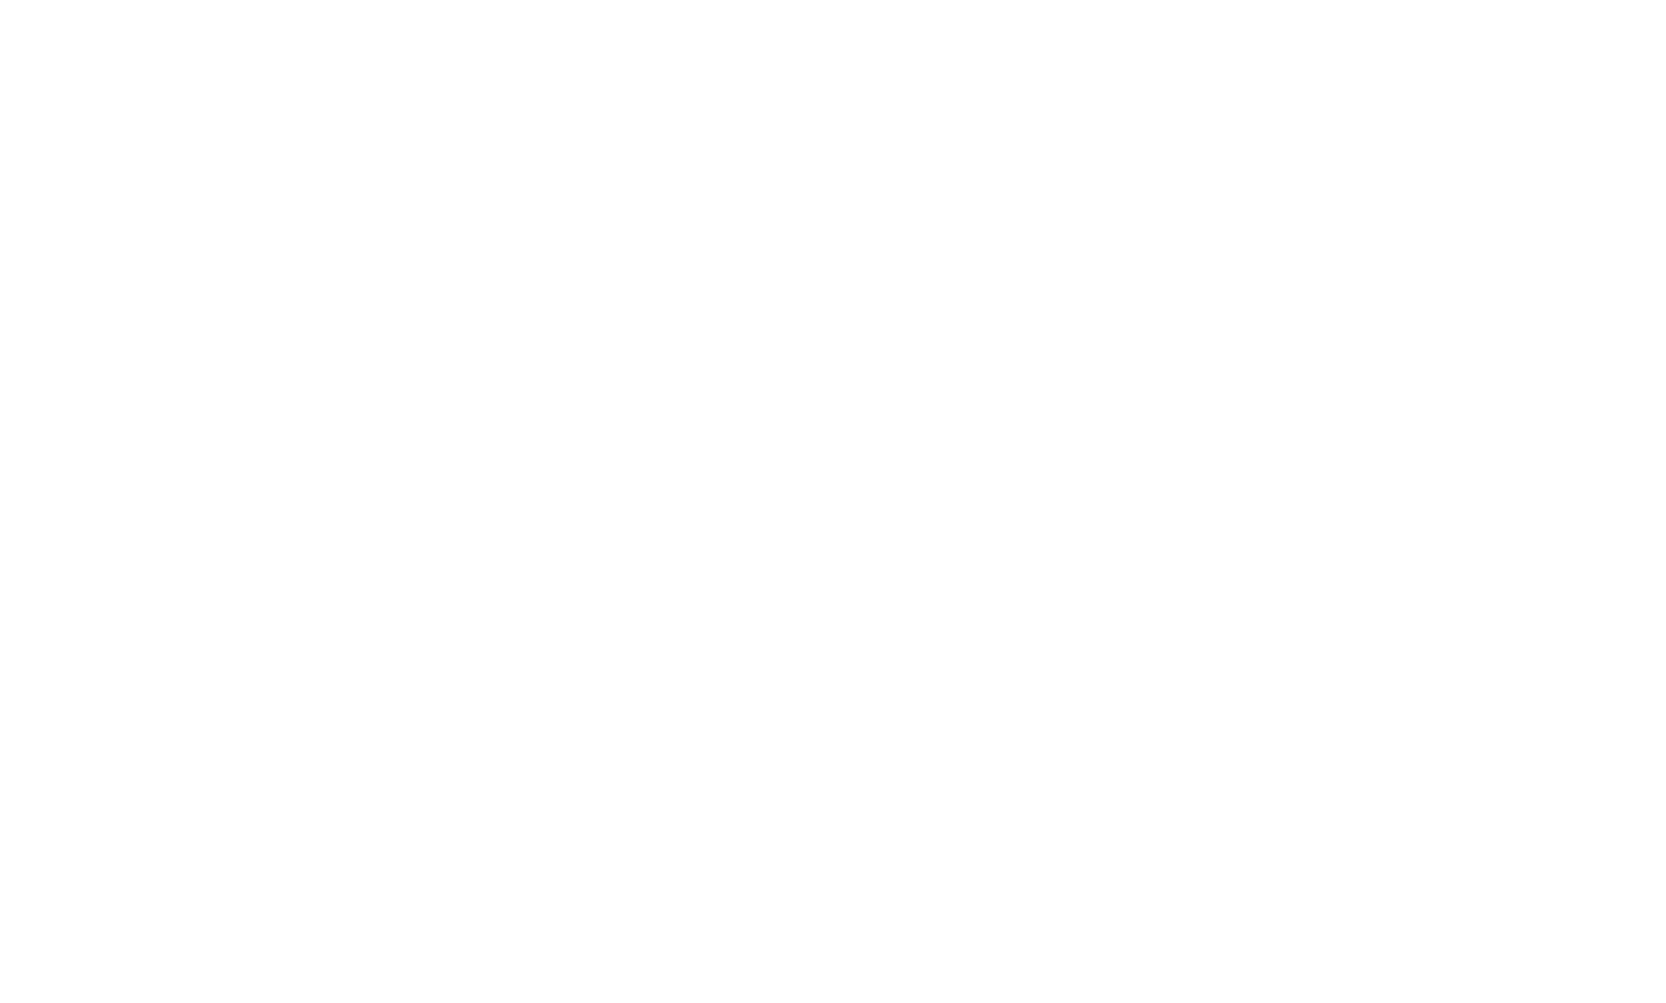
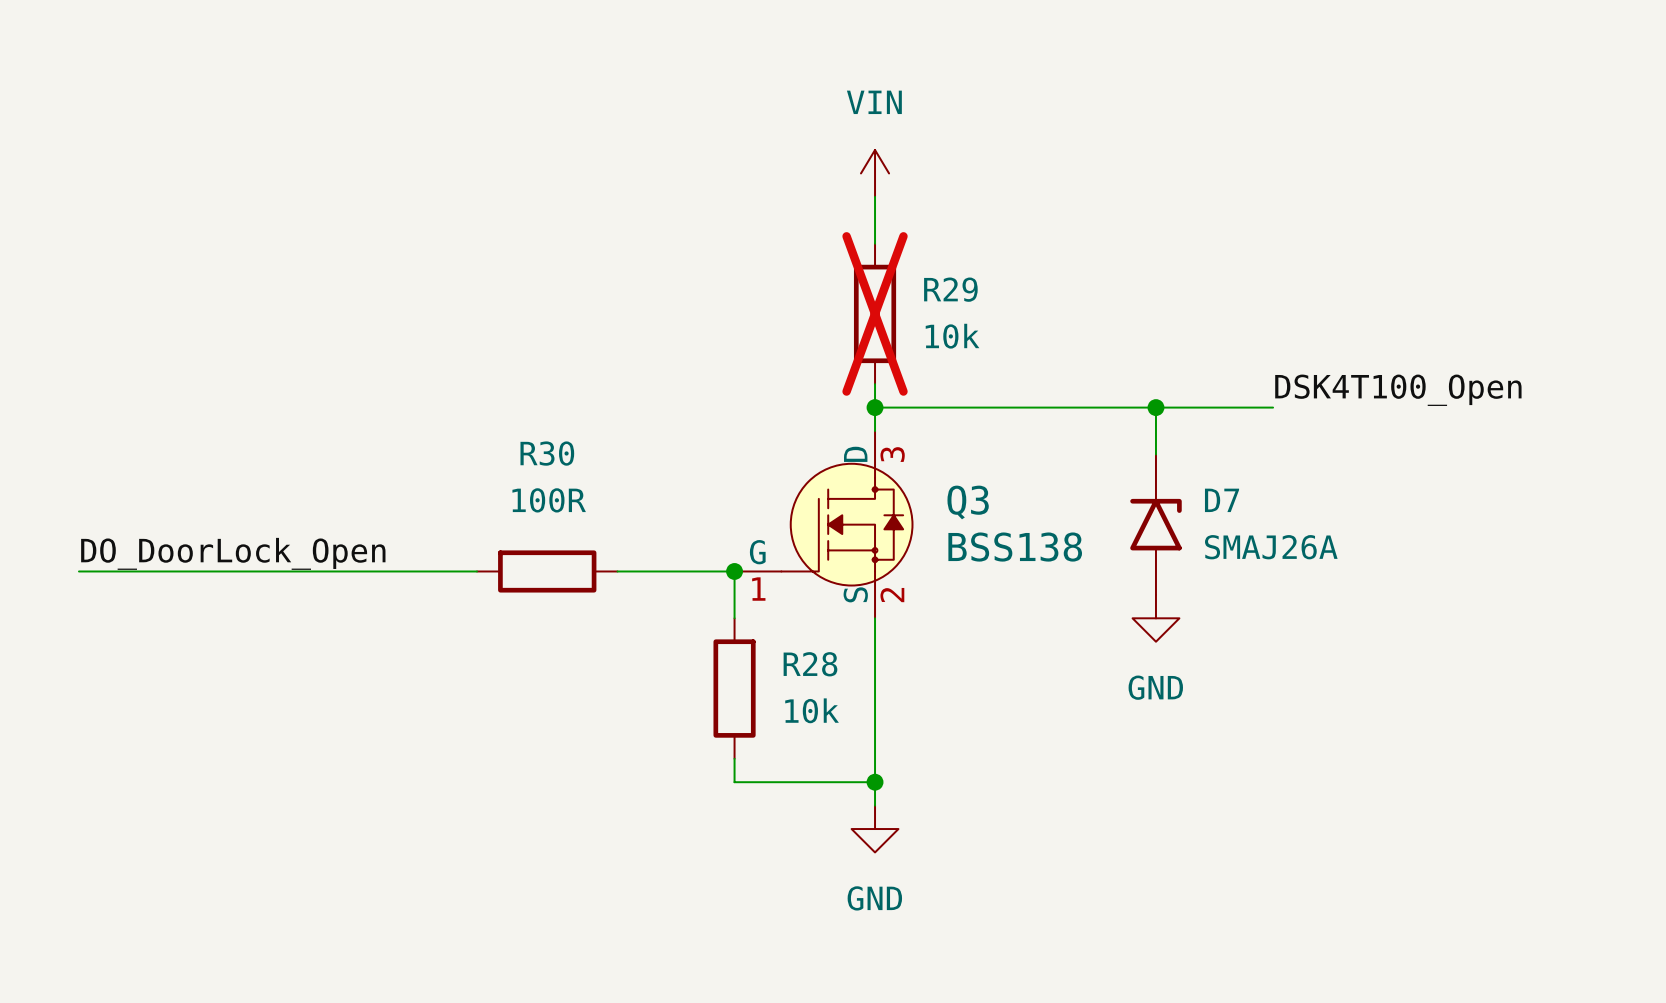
power symbol: none -> VIN (875, 173)
wire: none -> (875, 196) (875, 243)
R29: none -> 10k (875, 313)
wire: none -> (875, 384) (875, 431)
label: none -> DSK4T100_Open (1398, 390)
wire: none -> (875, 407) (1273, 407)
junction: none -> (875, 407)
wire: none -> (1155, 407) (1155, 454)
junction: none -> (1155, 407)
Q3: none -> BSS138 (823, 524)
D7: none -> SMAJ26A (1155, 524)
label: none -> DO_DoorLock_Open (233, 553)
wire: none -> (78, 571) (477, 571)
R30: none -> 100R (547, 571)
wire: none -> (617, 571) (734, 571) (734, 618)
junction: none -> (734, 571)
wire: none -> (875, 618) (875, 805)
power symbol: none -> GND (1155, 618)
R28: none -> 10k (734, 688)
wire: none -> (734, 758) (734, 782) (875, 782)
junction: none -> (875, 782)
power symbol: none -> GND (875, 829)

